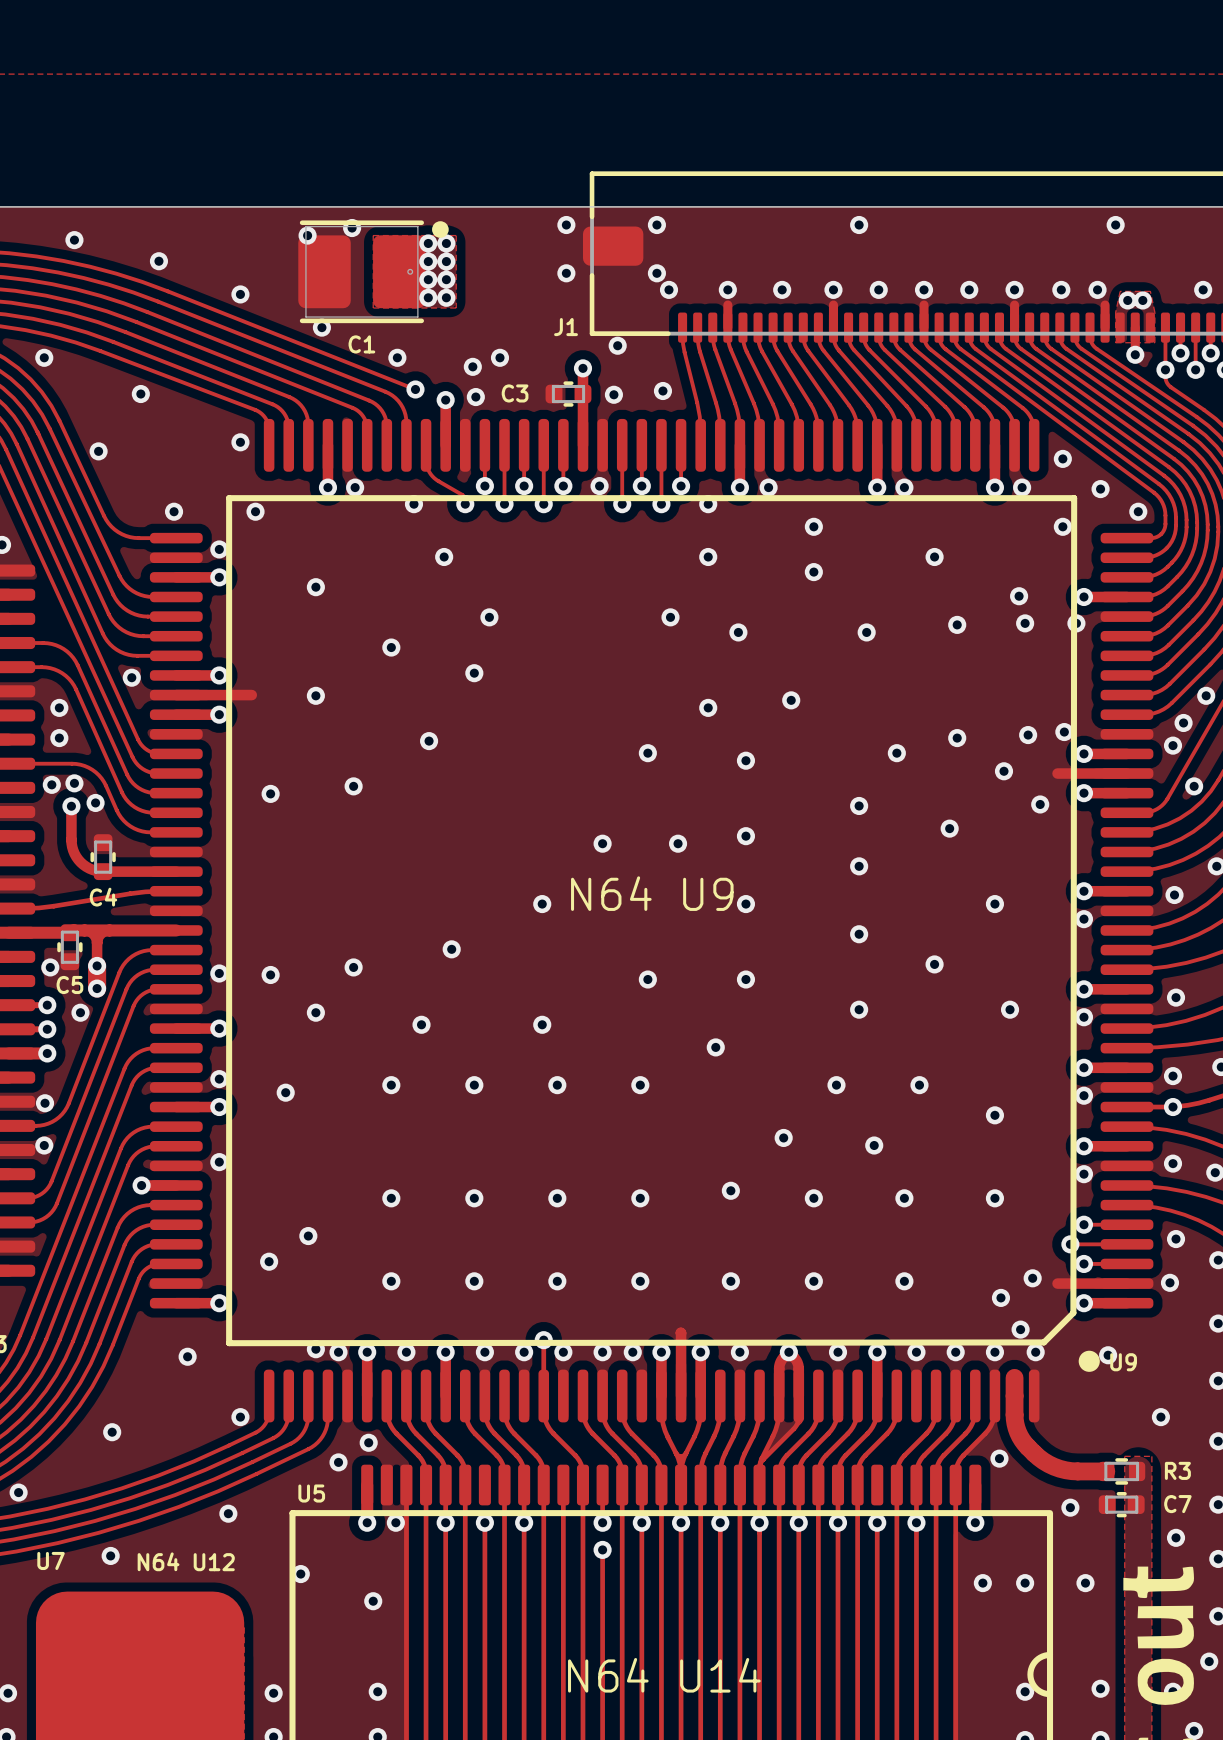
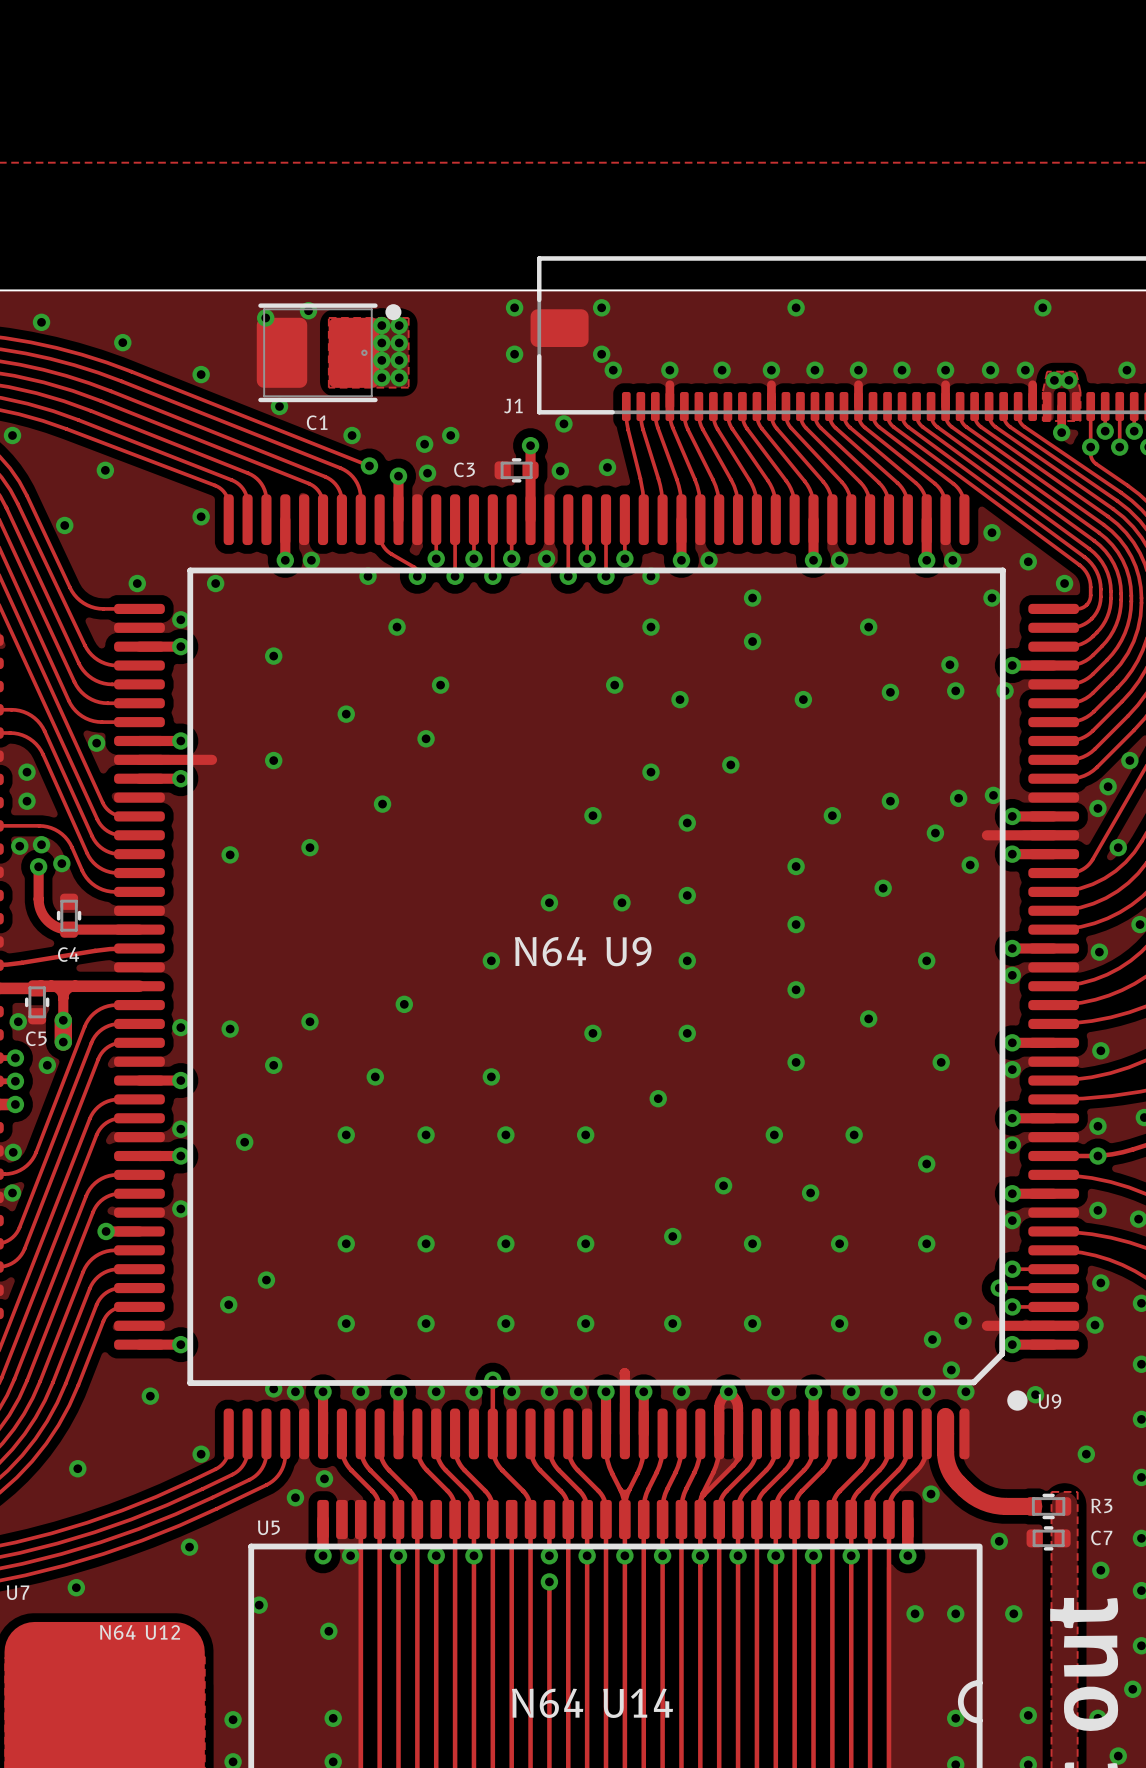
text position: N64 U12 (186, 1561) -> N64 U12 (140, 1632)

